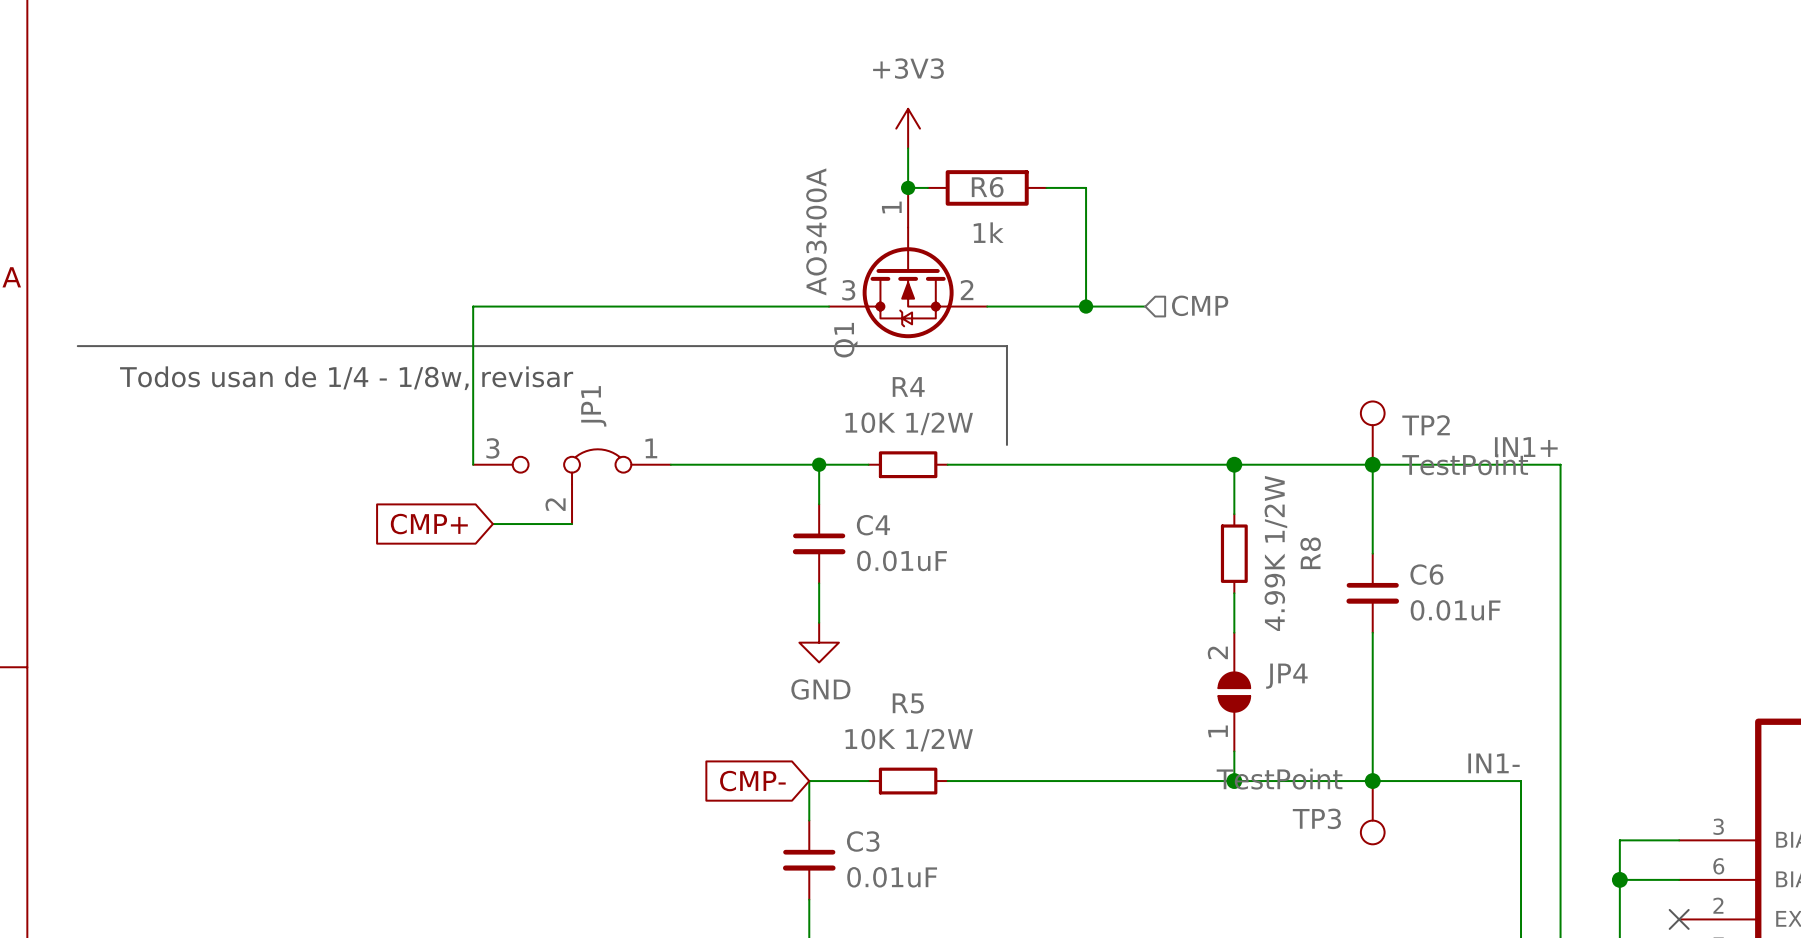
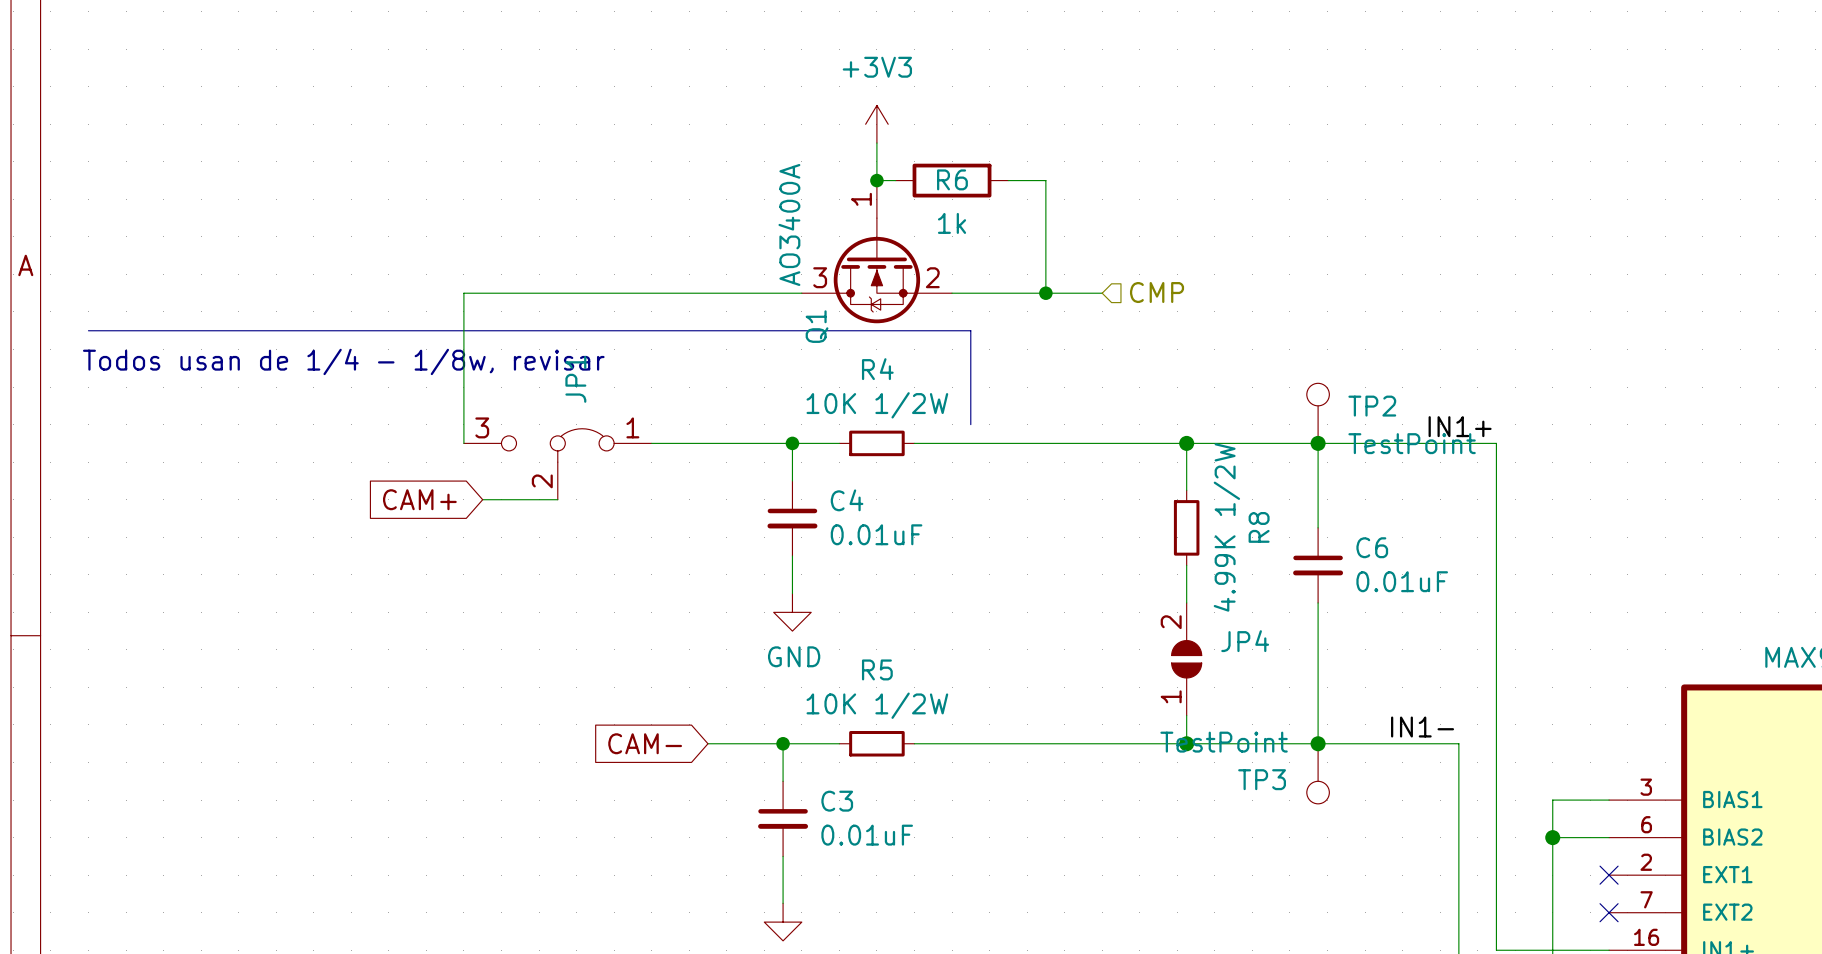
global label: CMP+ (429, 524) -> CAM+ (419, 499)
wire: none -> (707, 743) (783, 743)
global label: CMP- (752, 781) -> CAM- (645, 743)
junction: none -> (783, 743)

